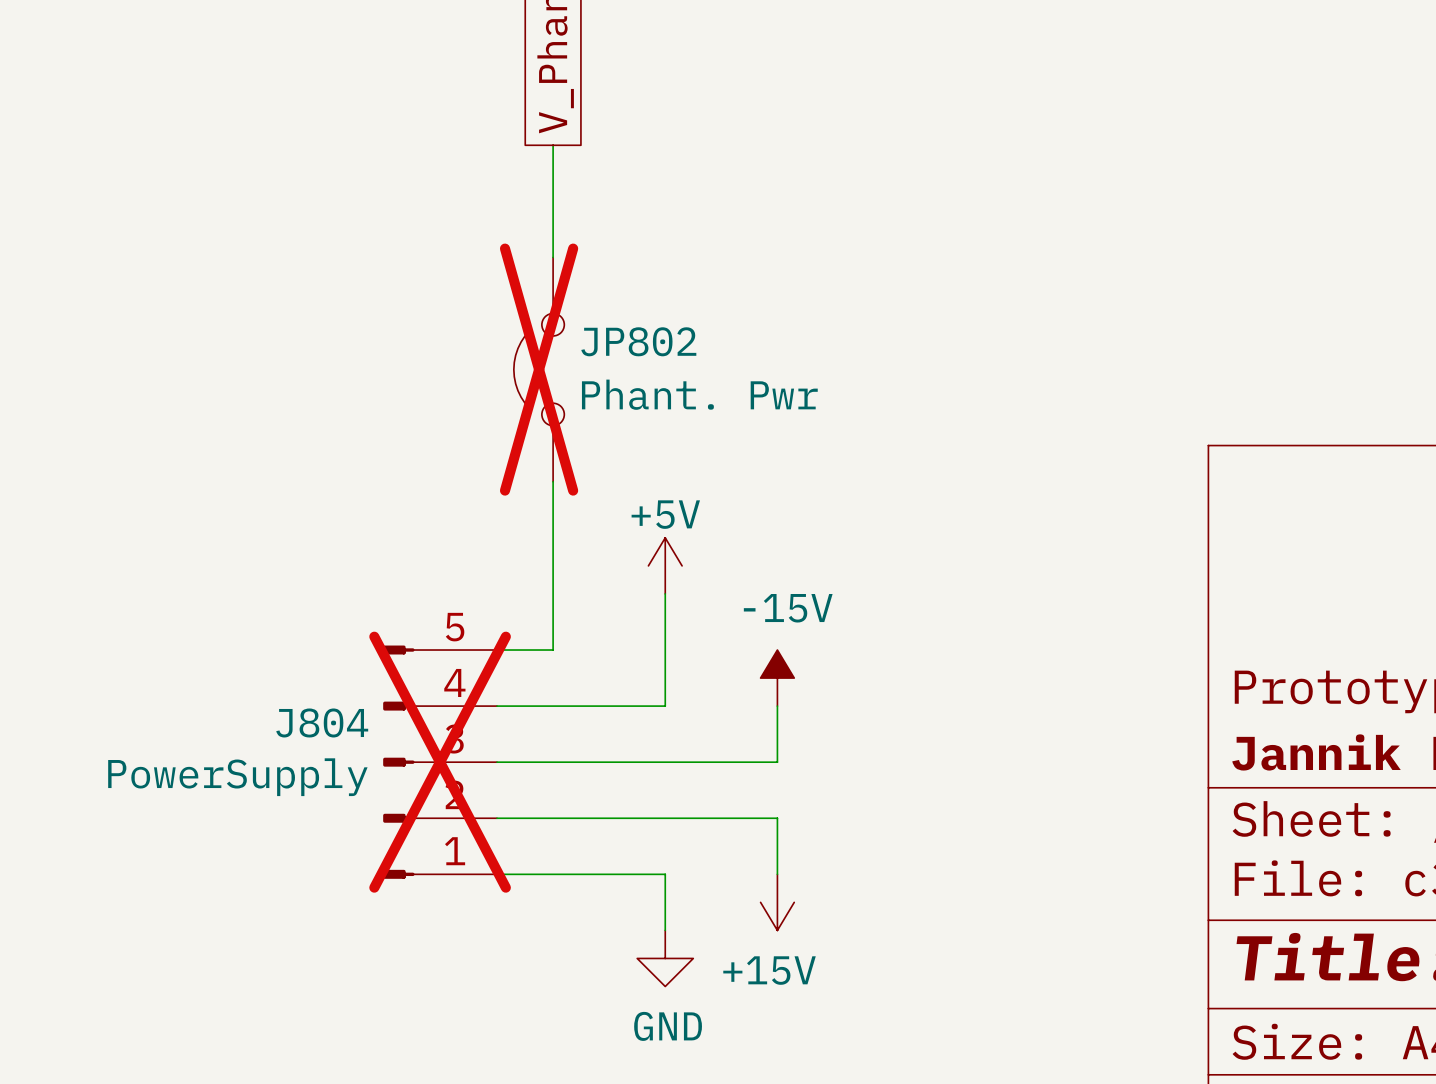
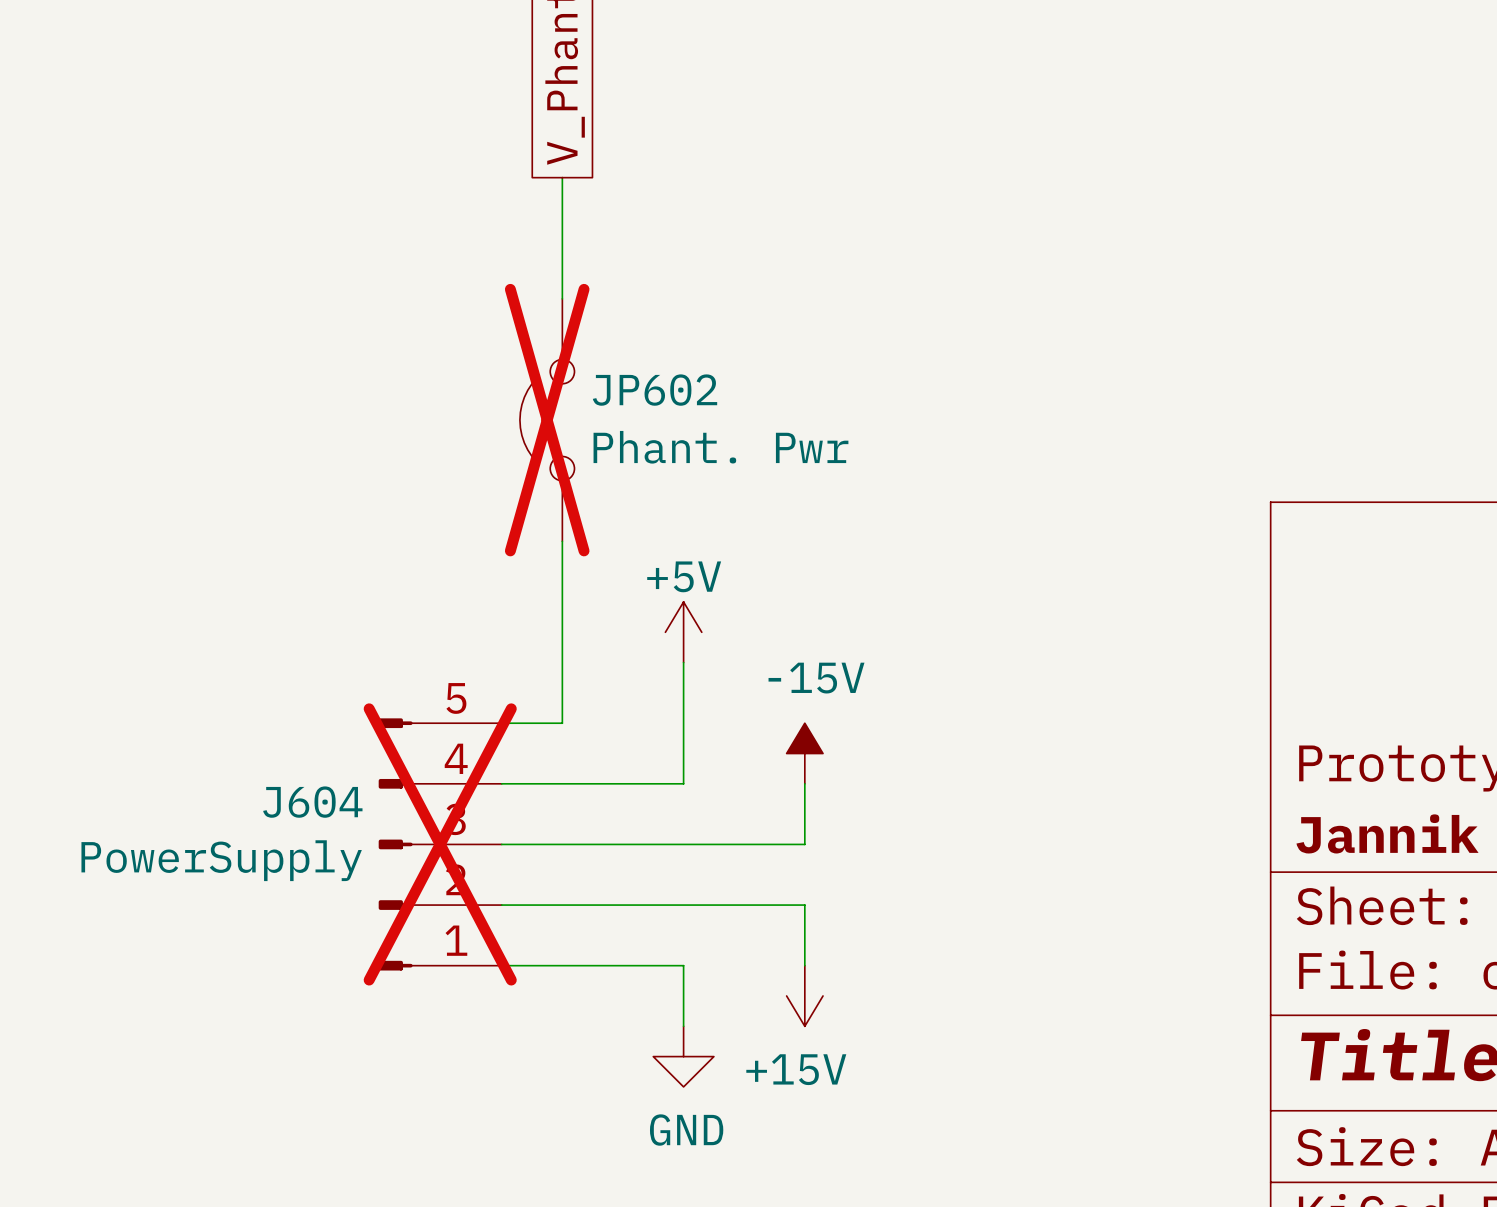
JP802 name: JP802 (638, 341) -> JP602 (655, 390)
J804 name: J804 (322, 722) -> J604 (312, 802)

